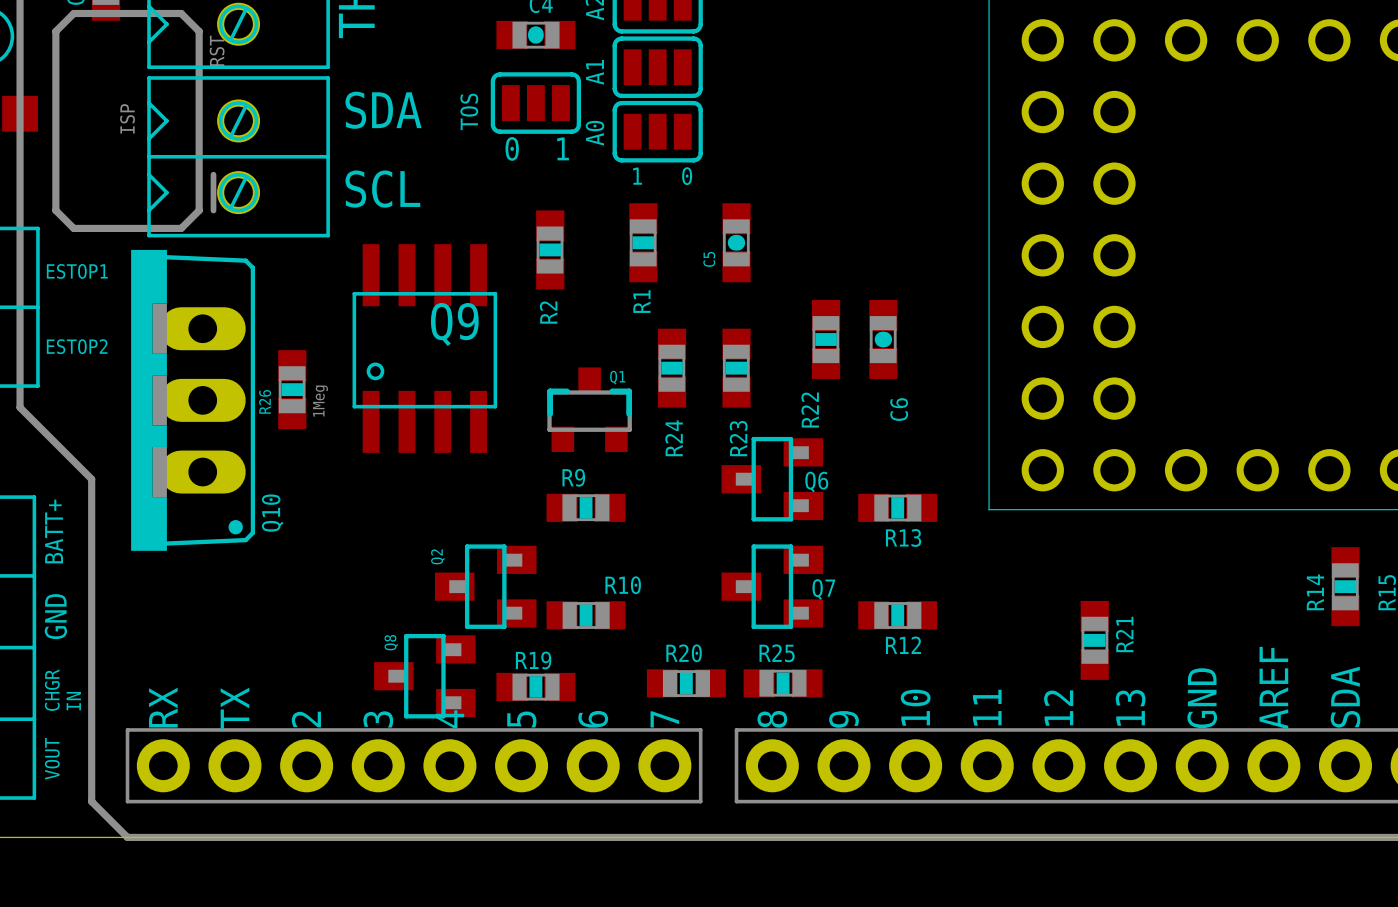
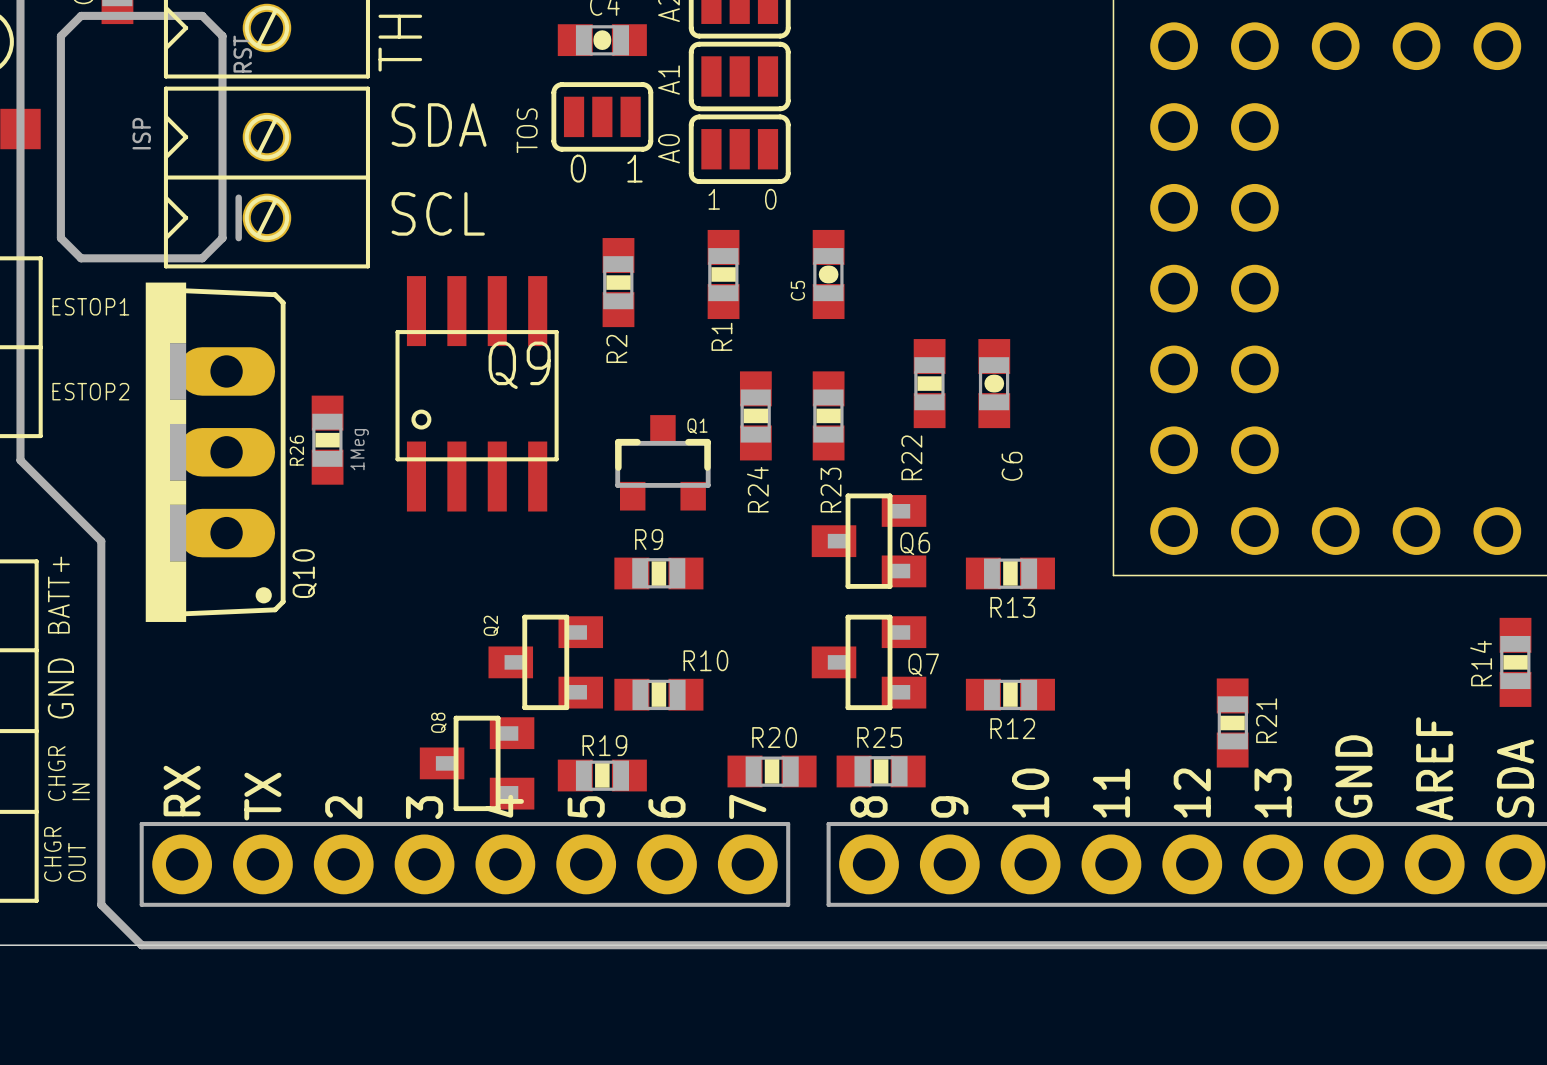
text: VOUT (52, 758) -> CHGR (52, 854)
text: none -> OUT (77, 862)

